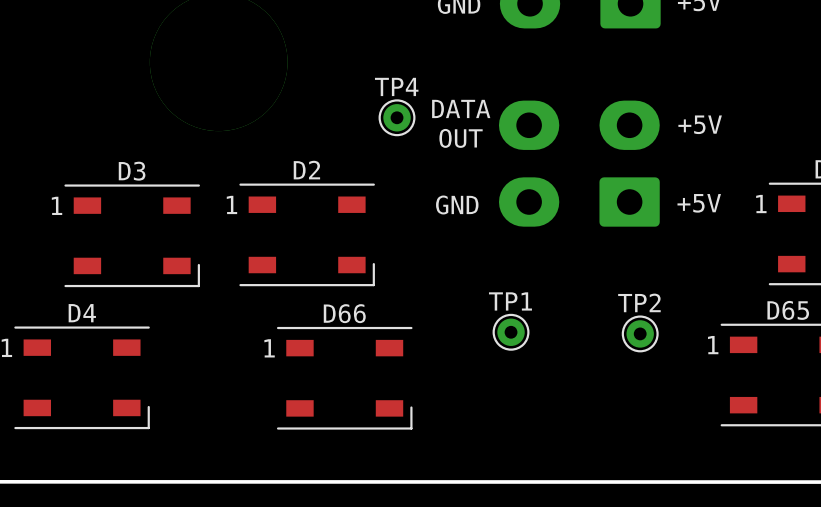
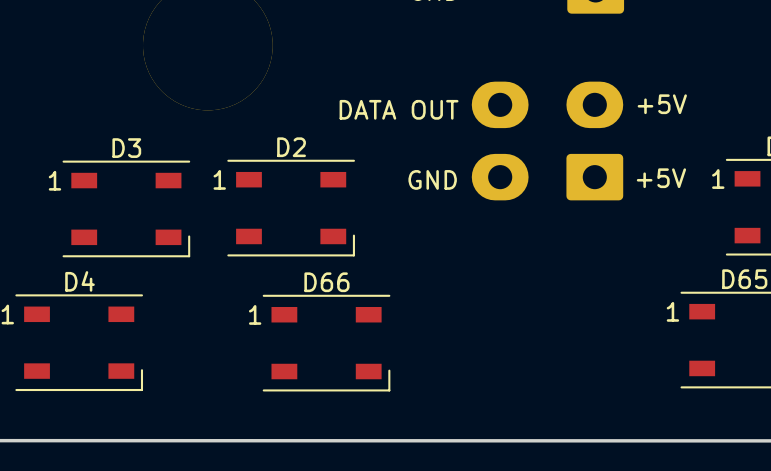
text: DATA (461, 108) -> DATA OUT (399, 109)
part: (397, 117) -> none
text: OUT (461, 138) -> none
part: (511, 332) -> none
part: (640, 333) -> none

